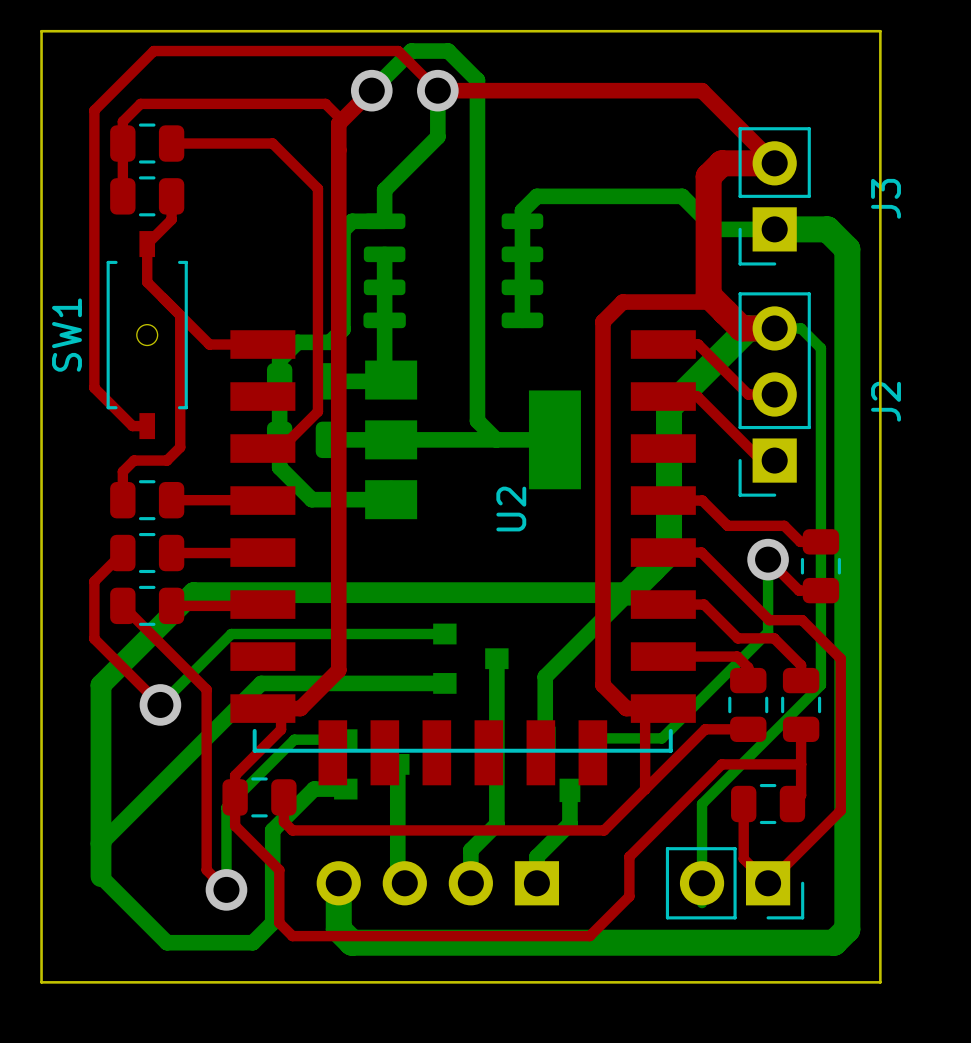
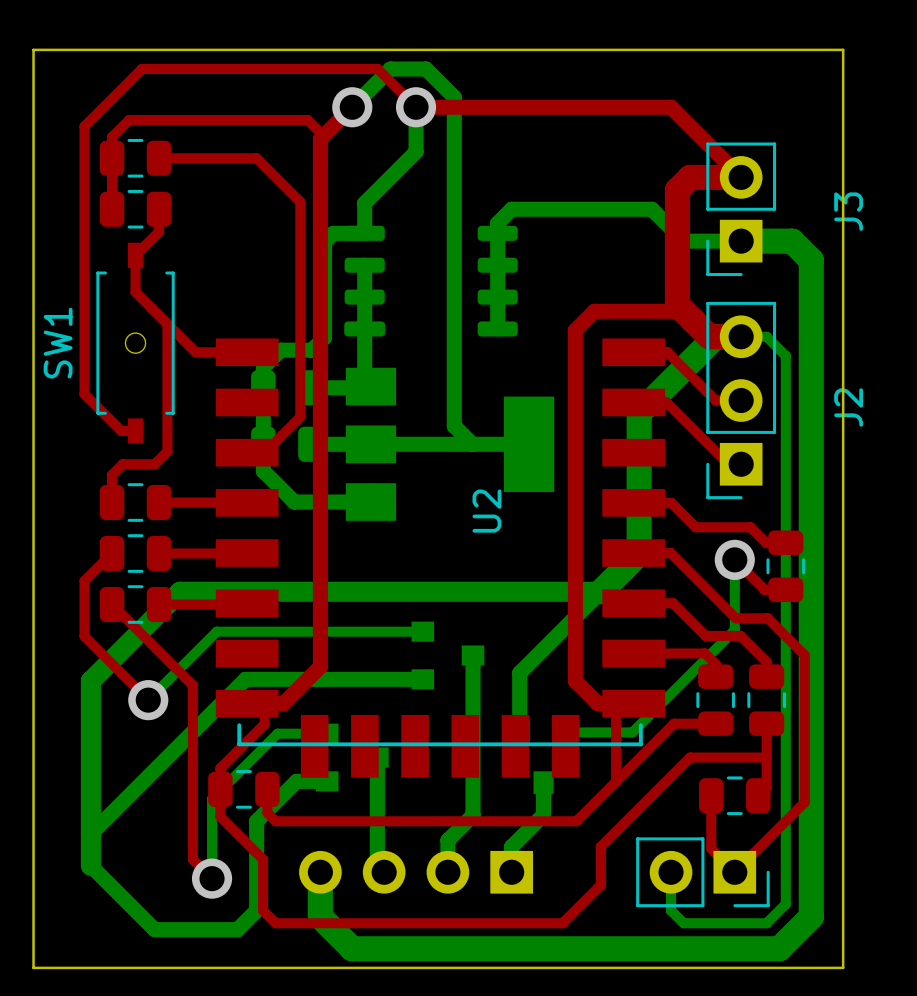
bottom track: (820, 685) (702, 804) (702, 883) -> (785, 681) (785, 904) (766, 923) (683, 923) (671, 910) (671, 891)
bottom track: (351, 942) (834, 942) -> (333, 929) (352, 948) (779, 948) (798, 929)

